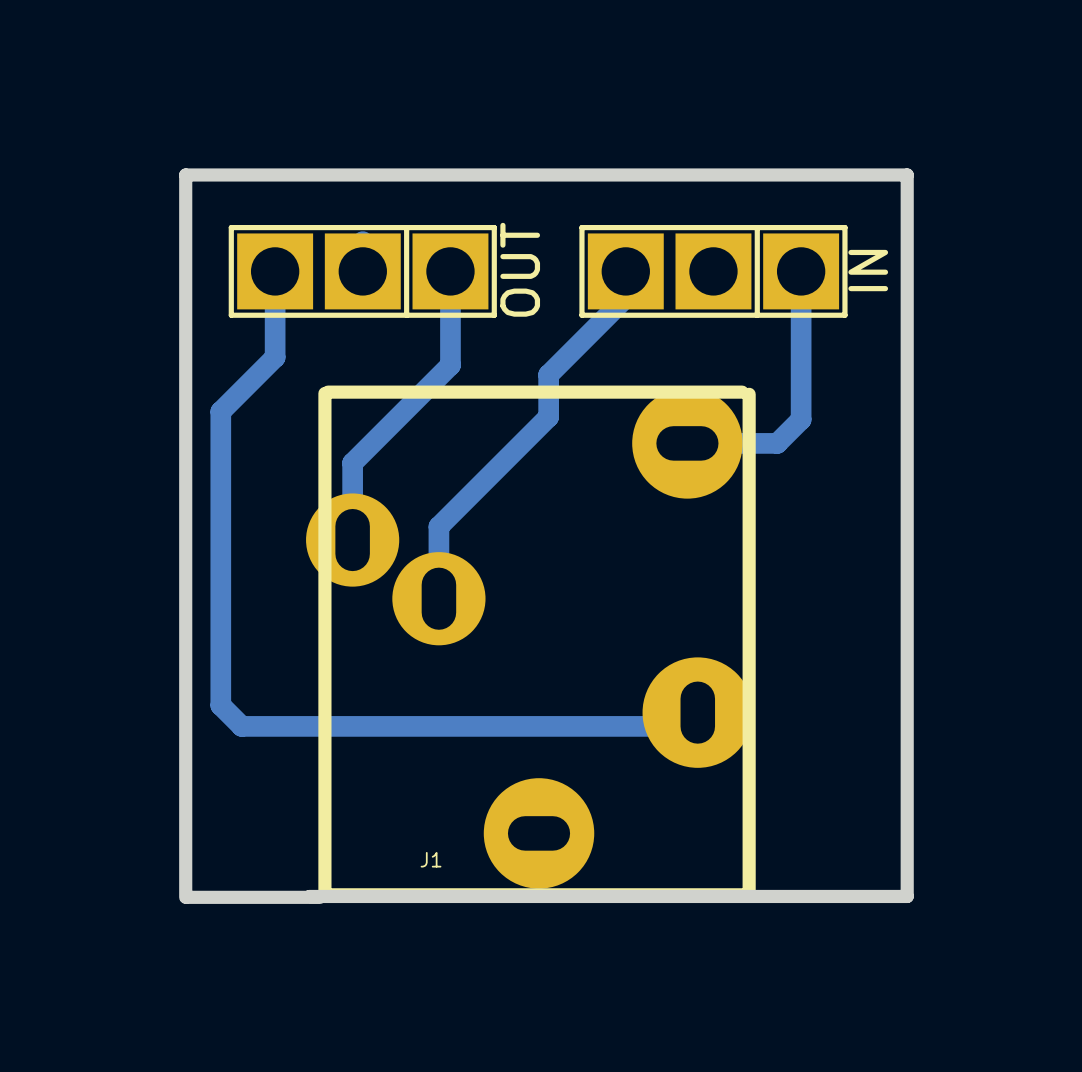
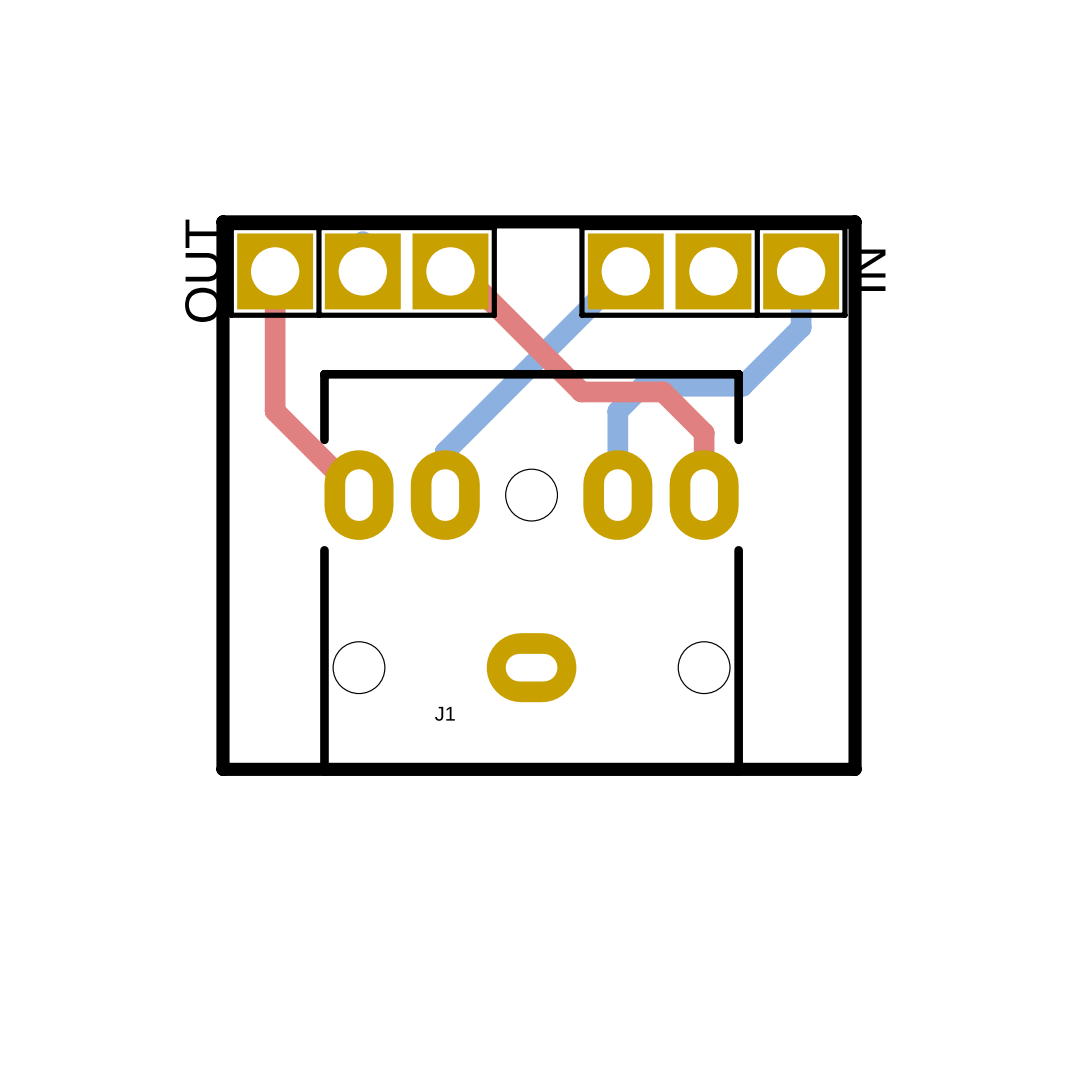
board edge: none -> (222, 221) (855, 221) (855, 769) (222, 769) (222, 221)
top track: none -> (275, 271) (275, 411) (358, 495)
part rotation: 0° (362, 271) -> 180° (362, 271)
bottom track: (450, 271) (450, 365) (352, 463) (352, 540) -> none
top track: none -> (450, 271) (460, 271) (581, 391) (663, 391) (704, 433) (704, 495)
bottom track: none -> (625, 271) (445, 451) (445, 495)
bottom track: (275, 278) (275, 357) (220, 411) (220, 705) (241, 726) (683, 726) (699, 712) -> none
bottom track: (625, 282) (625, 297) (548, 374) (548, 416) (438, 526) (438, 598) -> none
bottom track: (801, 327) (801, 419) (777, 443) (687, 443) -> (801, 327) (742, 386) (642, 386) (617, 411) (617, 495)
J1 footprint: [306, 385, 756, 902] -> [320, 369, 743, 776]
J1 name position: J1 (431, 859) -> J1 (444, 713)
board edge: (309, 896) (907, 896) (907, 174) (185, 174) (185, 897) -> none
board edge: (186, 897) (319, 897) -> none

